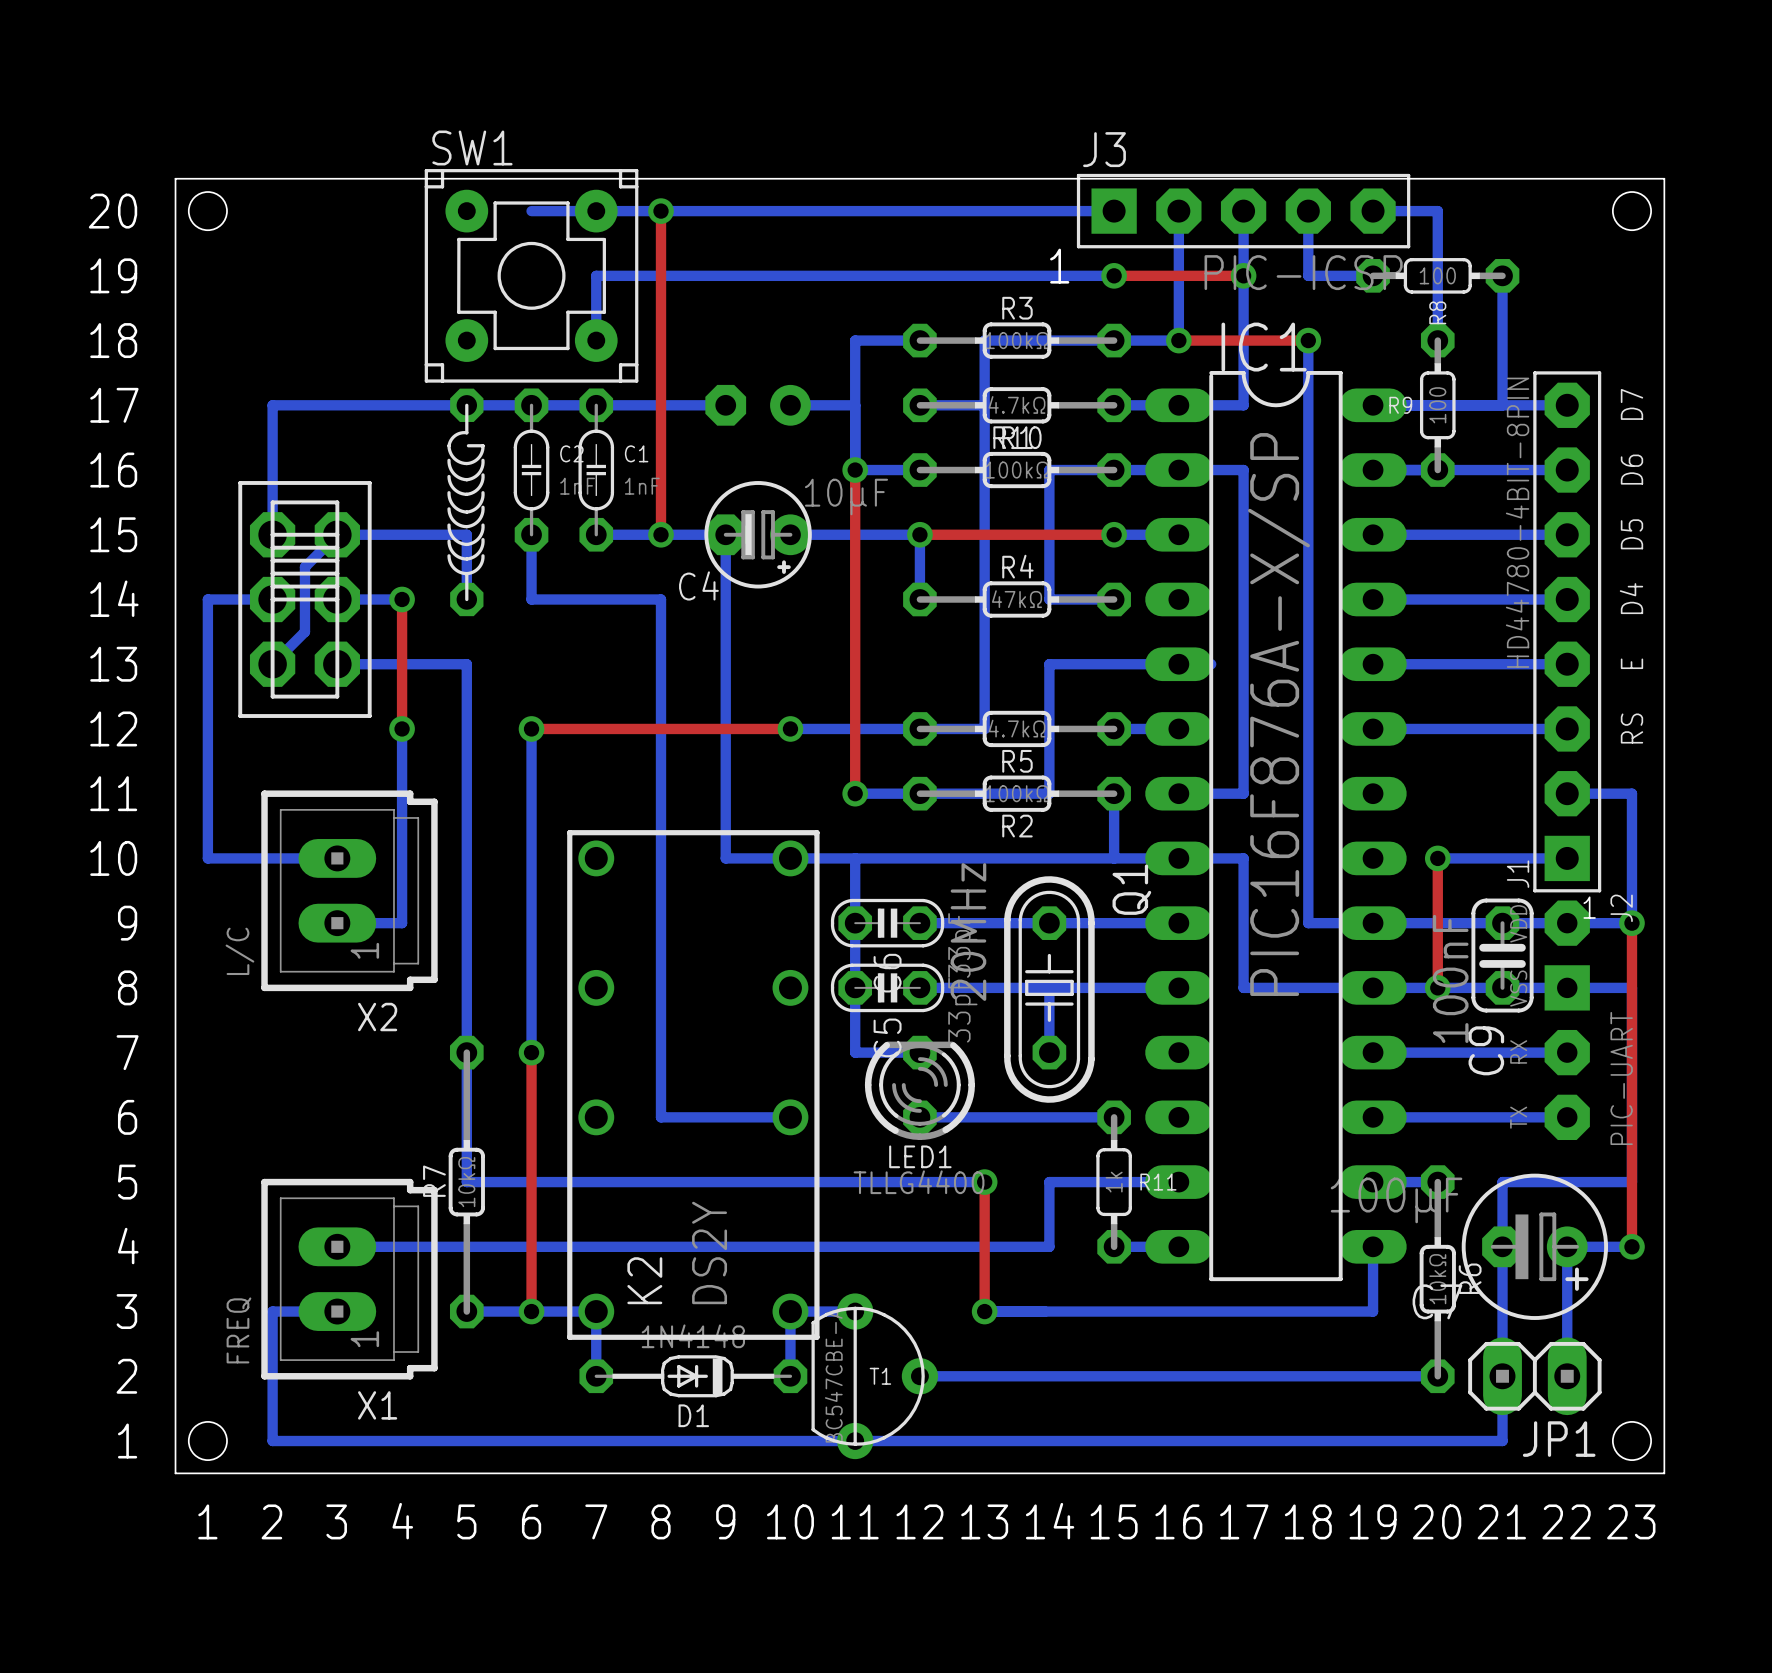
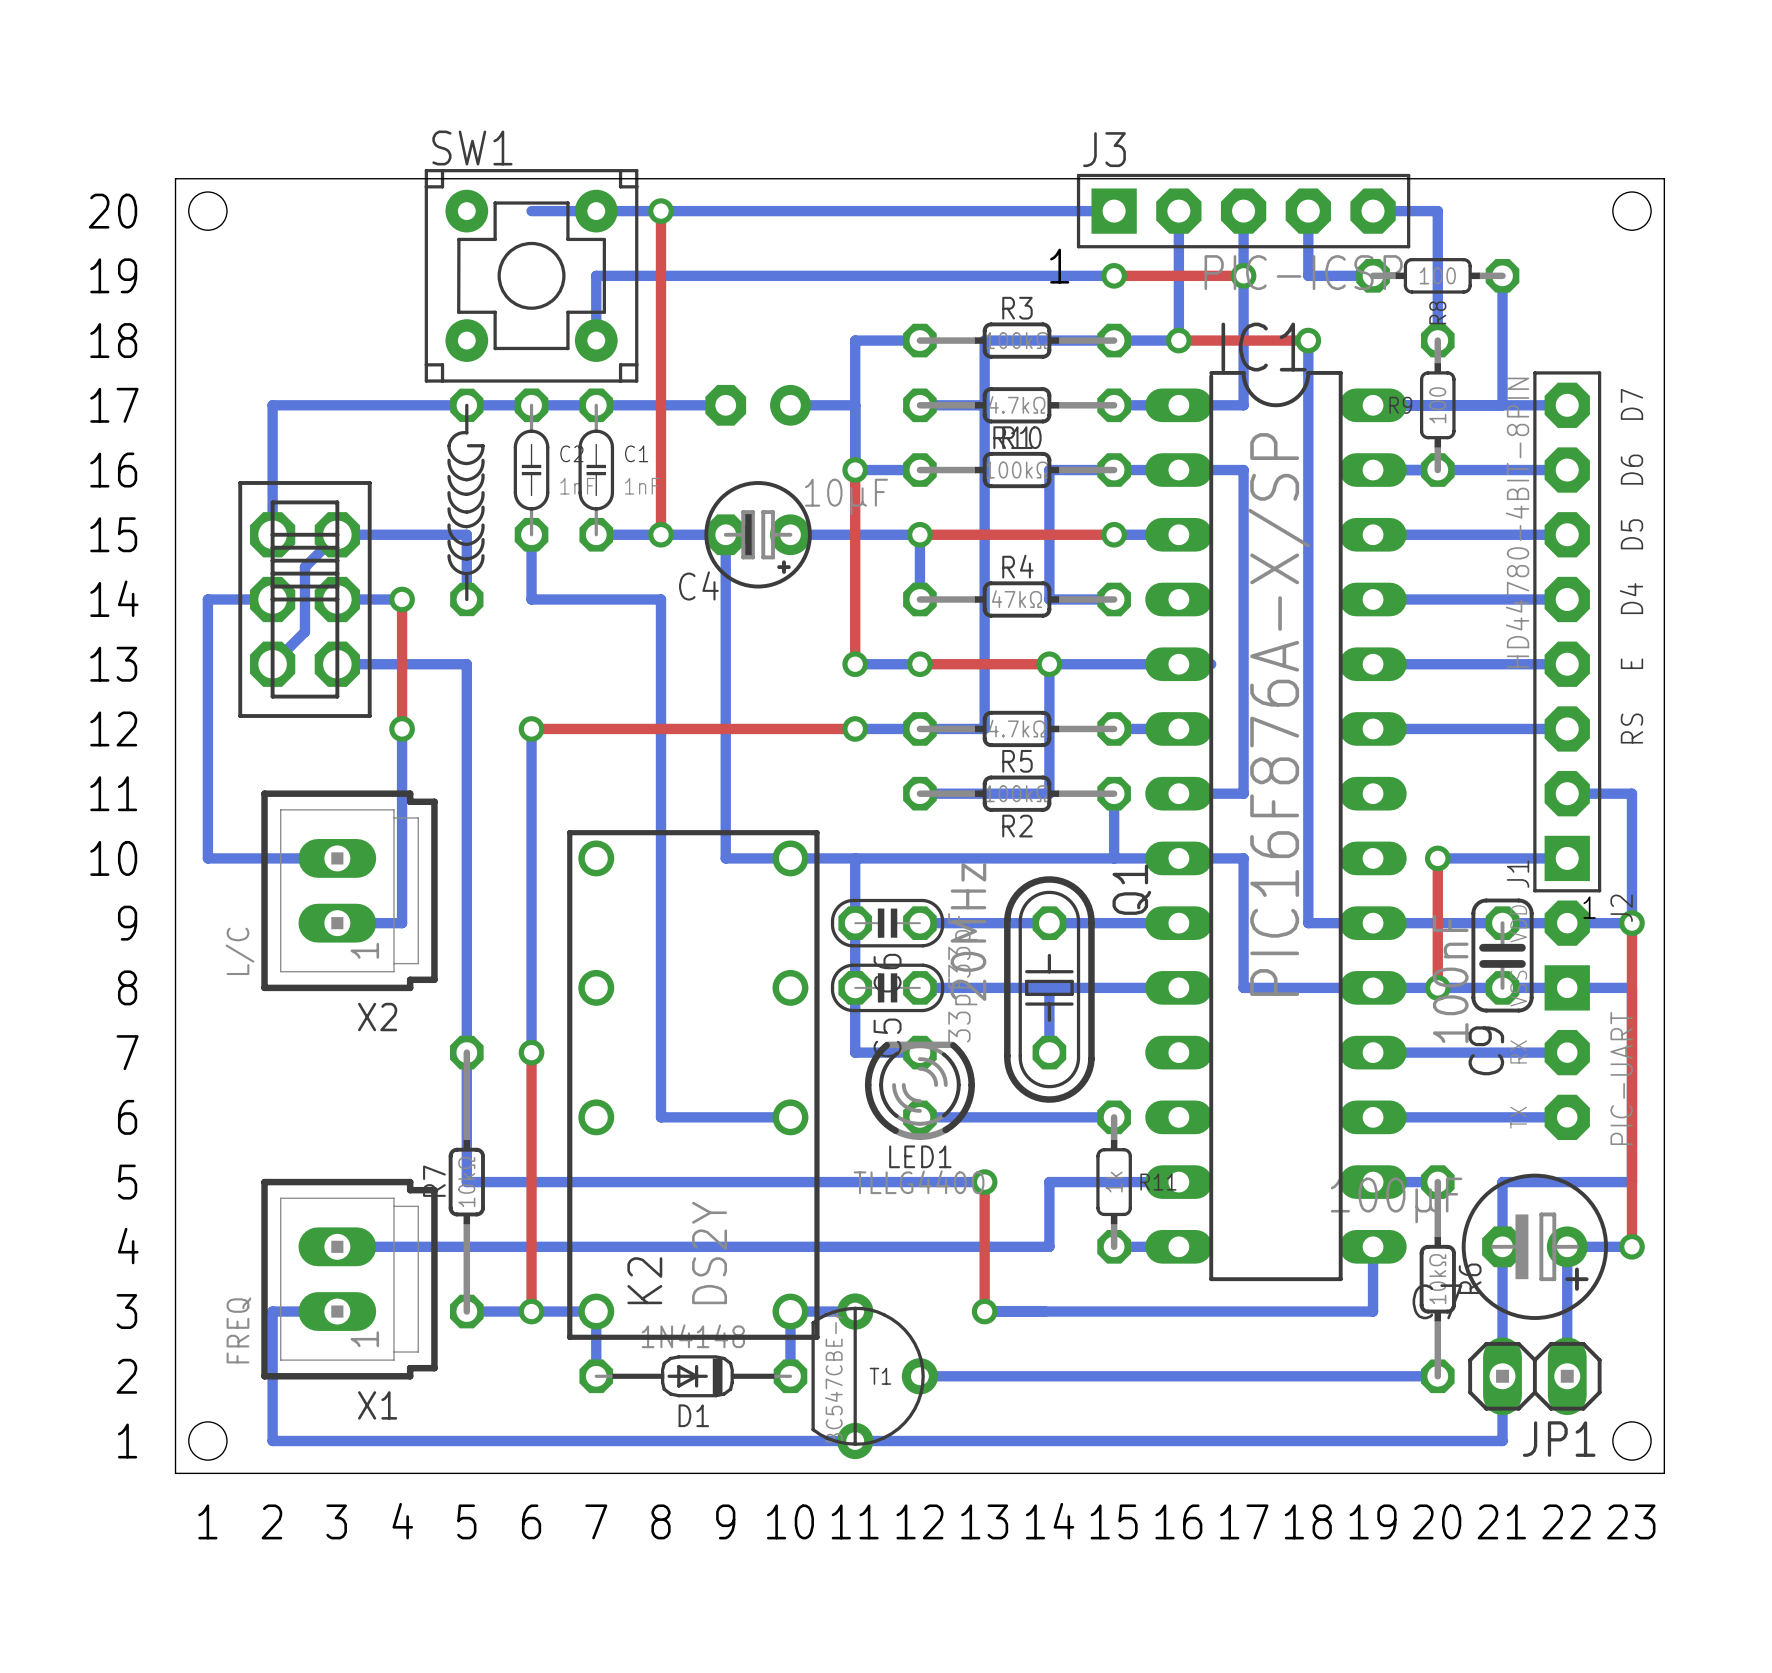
top track: (855, 664) (855, 793) -> none
via: none -> (855, 664)
top track: none -> (919, 664) (1049, 664)
via: none -> (919, 664)
via: none -> (1049, 664)
bottom track: (790, 728) (855, 728) -> (855, 664) (919, 664)
top track: none -> (790, 728) (855, 728)
via: (790, 728) -> none
via: none -> (855, 728)
bottom track: (855, 793) (919, 793) -> none
via: (855, 793) -> none

